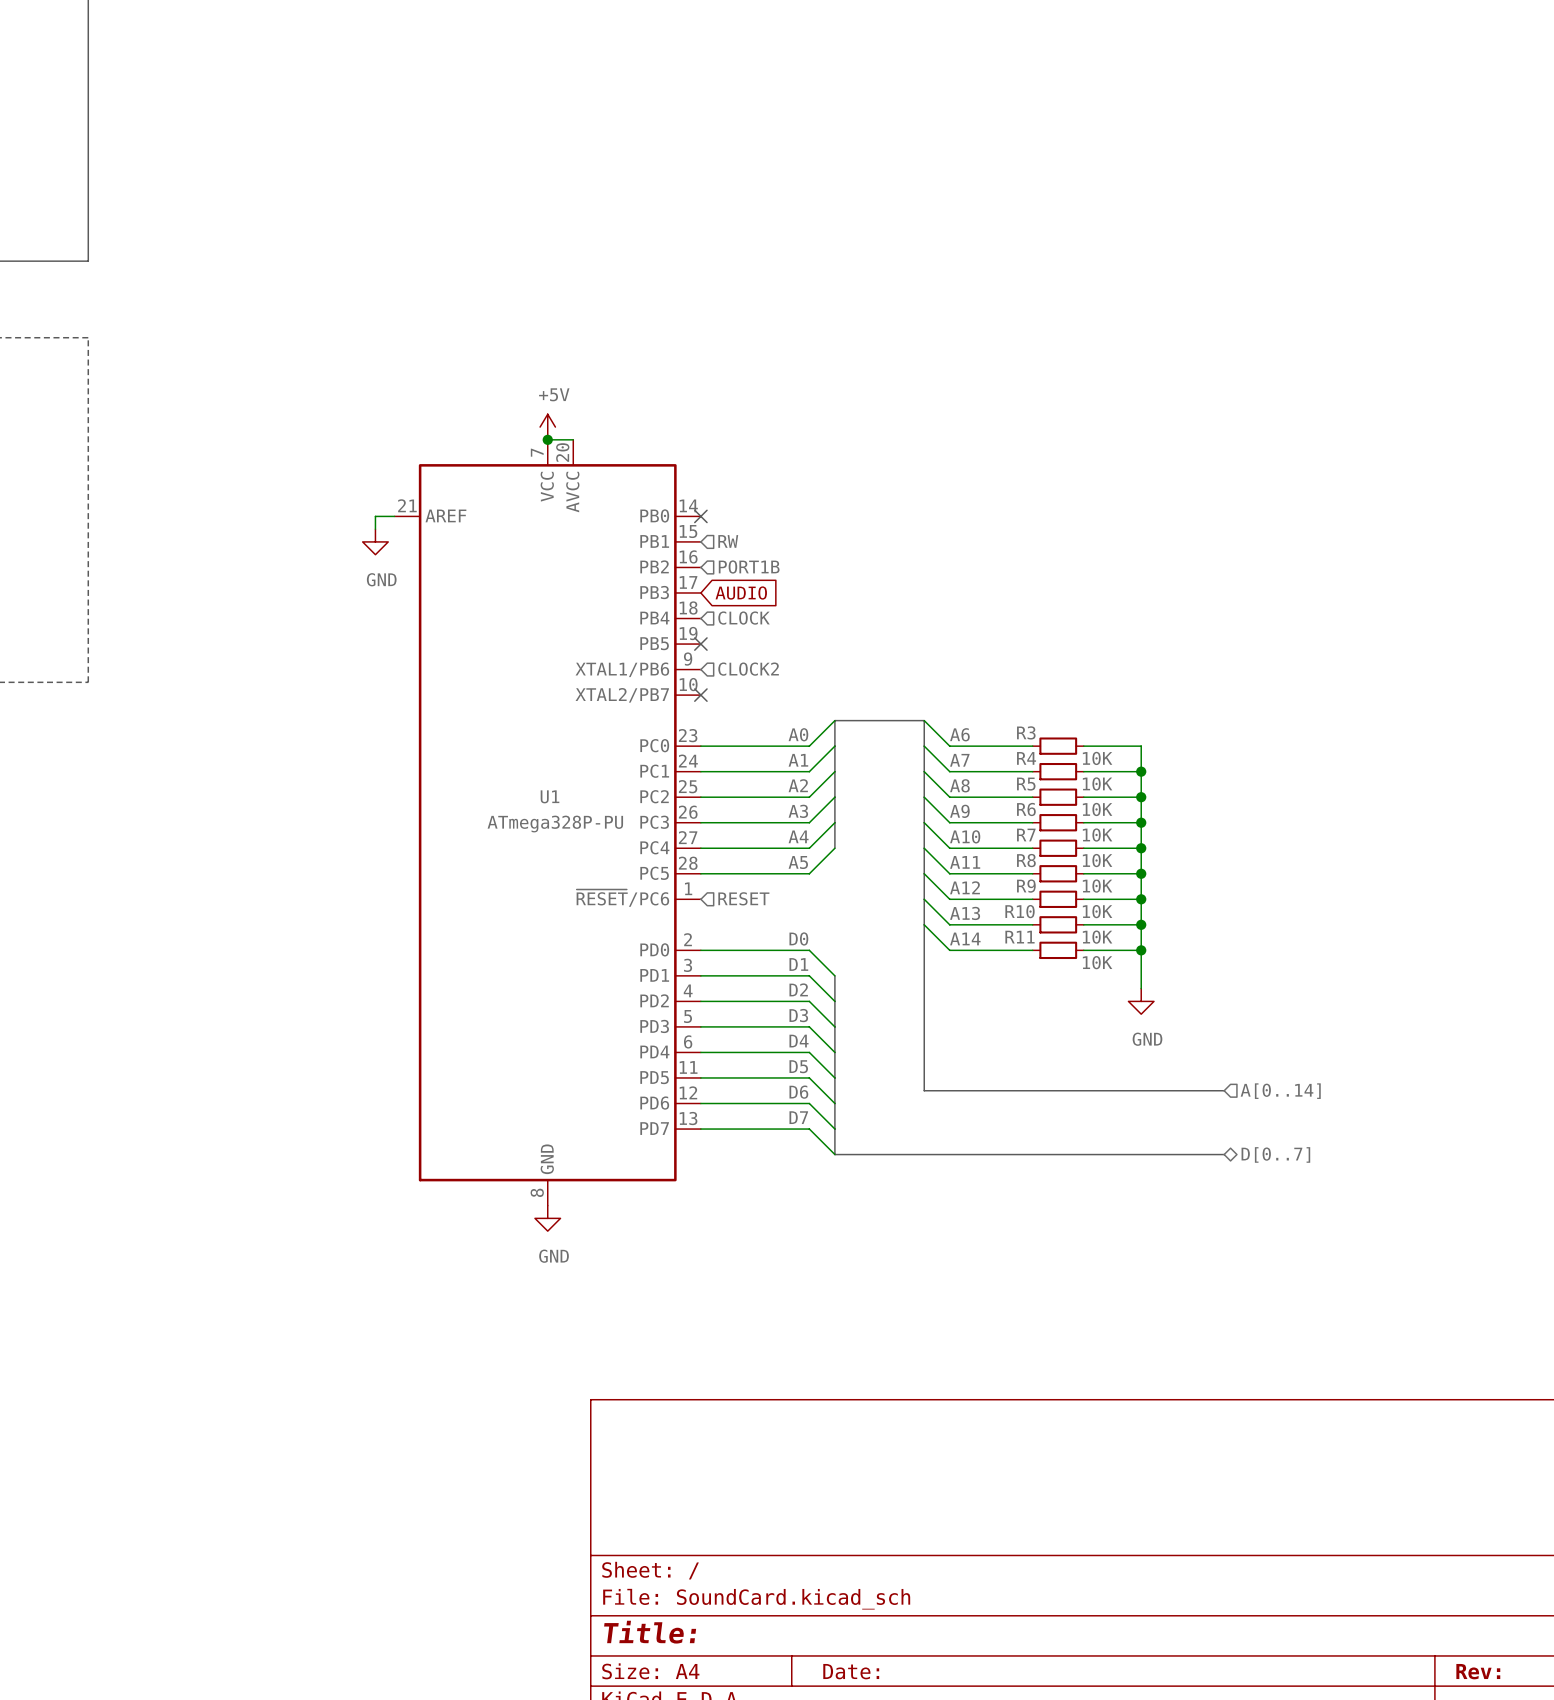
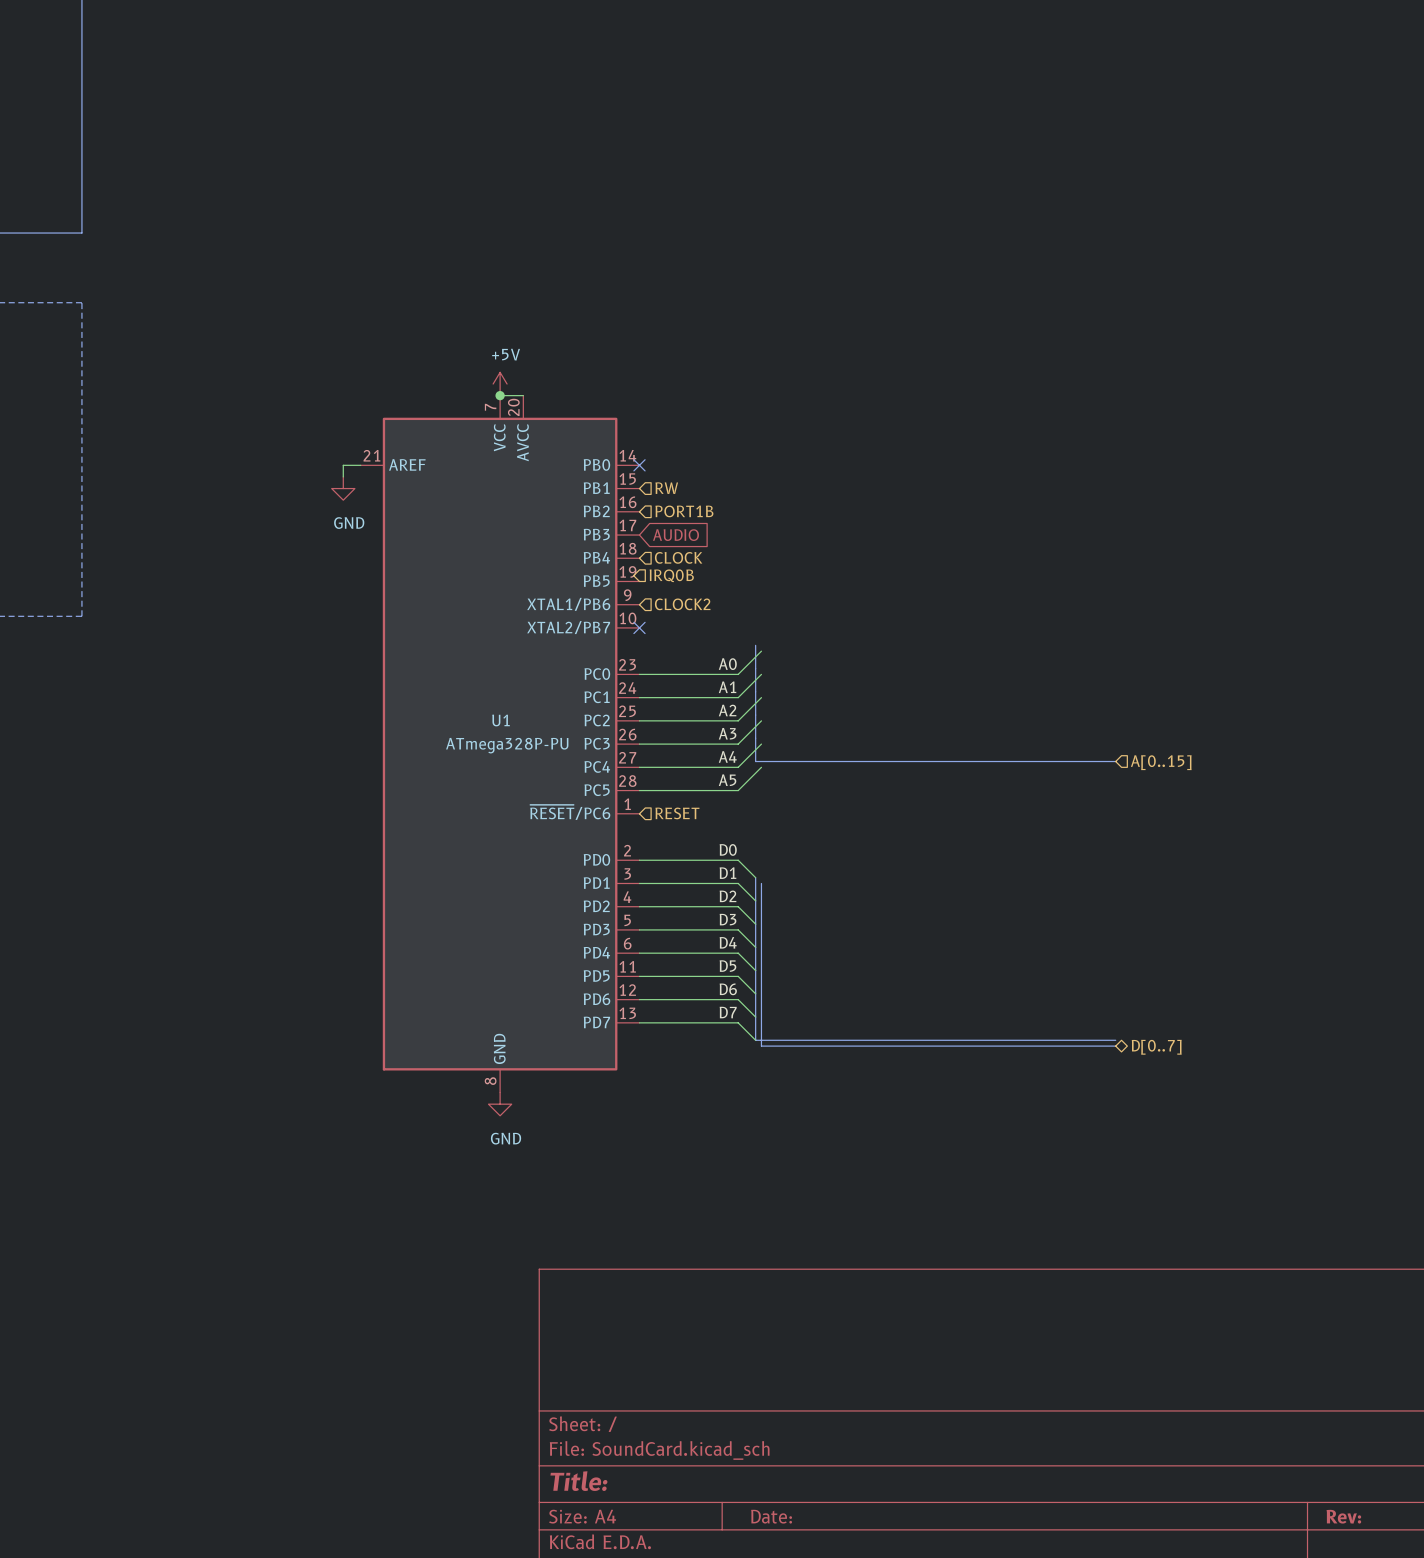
hierarchical label: none -> IRQ0B (671, 575)
no-connect mark: (700, 644) -> none
bus: none -> (755, 645) (755, 761) (1115, 761)
wire: (924, 720) (949, 746) (1032, 746) -> none
label: A6 (959, 734) -> none
wire: (924, 746) (949, 771) -> none
R3: 10K (1058, 746) -> none
wire: (1083, 746) (1141, 746) (1141, 988) -> none
label: A7 (959, 760) -> none
wire: (924, 771) (949, 797) (1032, 797) -> none
wire: (949, 771) (1032, 771) -> none
R4: 10K (1058, 771) -> none
wire: (1083, 771) (1141, 771) -> none
junction: (1141, 771) -> none
label: A8 (959, 785) -> none
wire: (924, 797) (949, 822) -> none
R5: 10K (1058, 797) -> none
wire: (1083, 797) (1141, 797) -> none
junction: (1141, 797) -> none
label: A9 (959, 811) -> none
wire: (924, 822) (949, 848) (1032, 848) -> none
wire: (949, 822) (1032, 822) -> none
R6: 10K (1058, 822) -> none
wire: (1083, 822) (1141, 822) -> none
junction: (1141, 822) -> none
label: A10 (965, 836) -> none
hierarchical label: none -> A[0..15] (1161, 762)
bus: (834, 848) (834, 720) (924, 720) (924, 1090) (1224, 1090) -> none
wire: (924, 848) (949, 873) (1032, 873) -> none
R7: 10K (1058, 848) -> none
wire: (1083, 848) (1141, 848) -> none
junction: (1141, 848) -> none
label: A11 (965, 862) -> none
wire: (924, 873) (949, 899) -> none
R8: 10K (1058, 873) -> none
wire: (1083, 873) (1141, 873) -> none
junction: (1141, 873) -> none
label: A12 (965, 887) -> none
wire: (924, 899) (949, 924) (1032, 924) -> none
wire: (949, 899) (1032, 899) -> none
R9: 10K (1058, 899) -> none
wire: (1083, 899) (1141, 899) -> none
junction: (1141, 899) -> none
label: A13 (965, 913) -> none
wire: (924, 924) (949, 950) -> none
R10: 10K (1058, 924) -> none
wire: (1083, 924) (1141, 924) -> none
junction: (1141, 924) -> none
label: A14 (965, 938) -> none
wire: (949, 950) (1032, 950) -> none
R11: 10K (1058, 950) -> none
wire: (1083, 950) (1141, 950) -> none
junction: (1141, 950) -> none
wire: (828, 969) (834, 975) -> none
bus: none -> (755, 877) (755, 1040) (1115, 1040)
wire: (828, 995) (834, 1001) -> none
power symbol: GND (1141, 1001) -> none
wire: (828, 1020) (834, 1026) -> none
wire: (828, 1046) (834, 1052) -> none
wire: (828, 1071) (834, 1077) -> none
hierarchical label: A[0..14] (1280, 1091) -> none
wire: (828, 1097) (834, 1103) -> none
wire: (828, 1122) (834, 1129) -> none
wire: (828, 1148) (834, 1154) -> none

